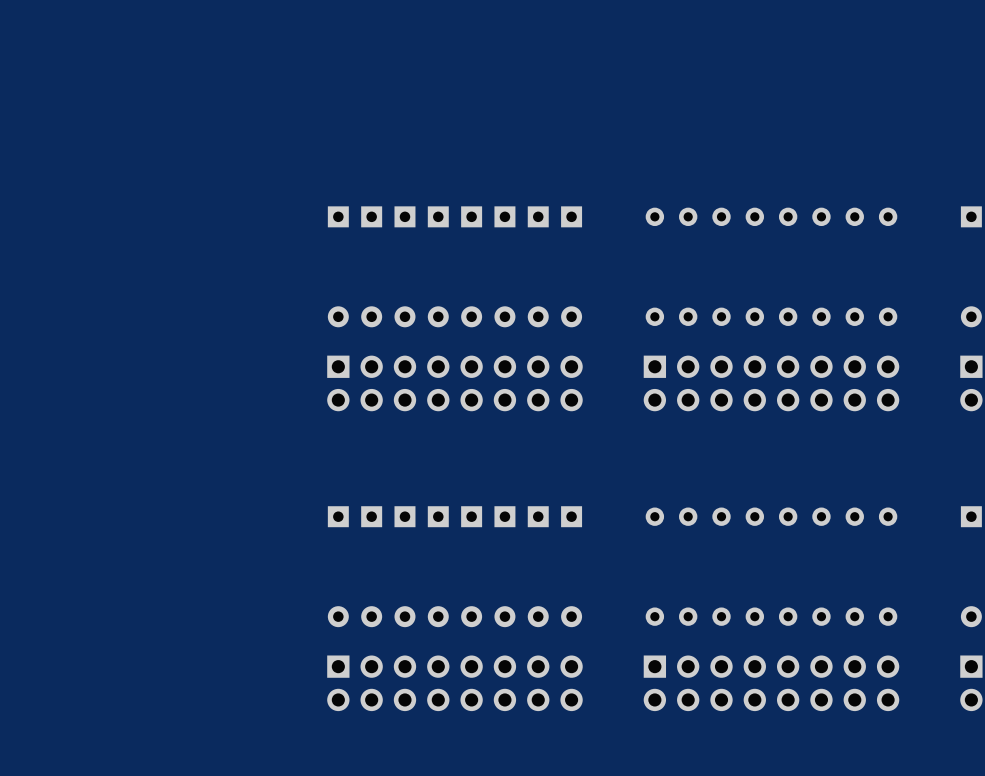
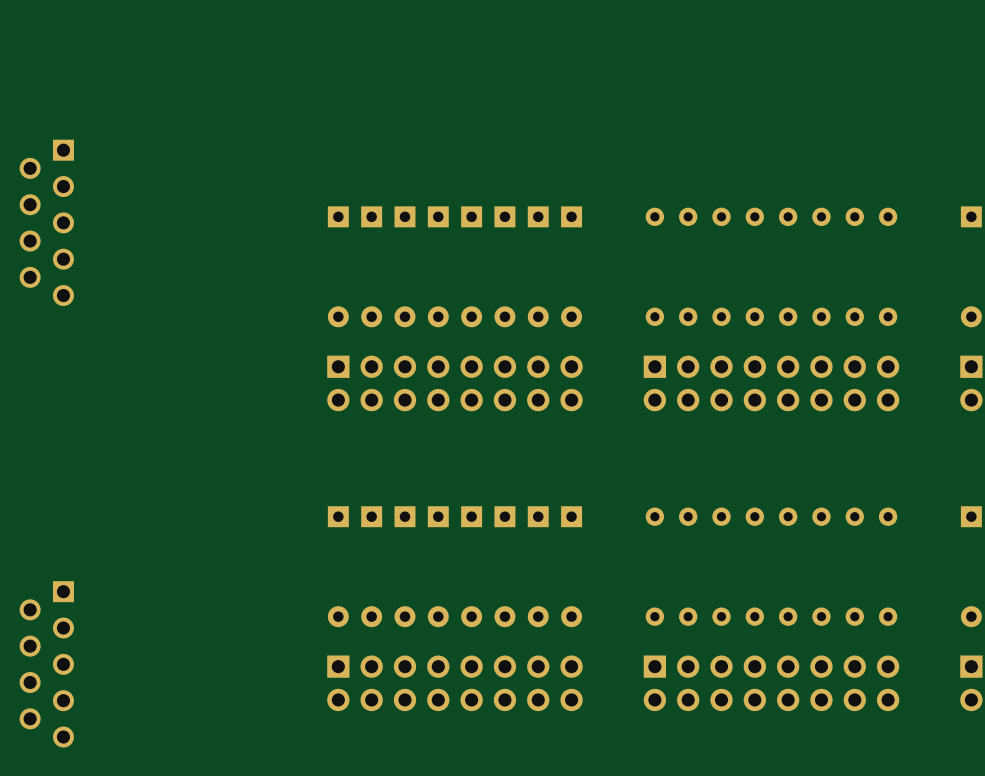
part: none -> (46, 222)
part: none -> (46, 664)

